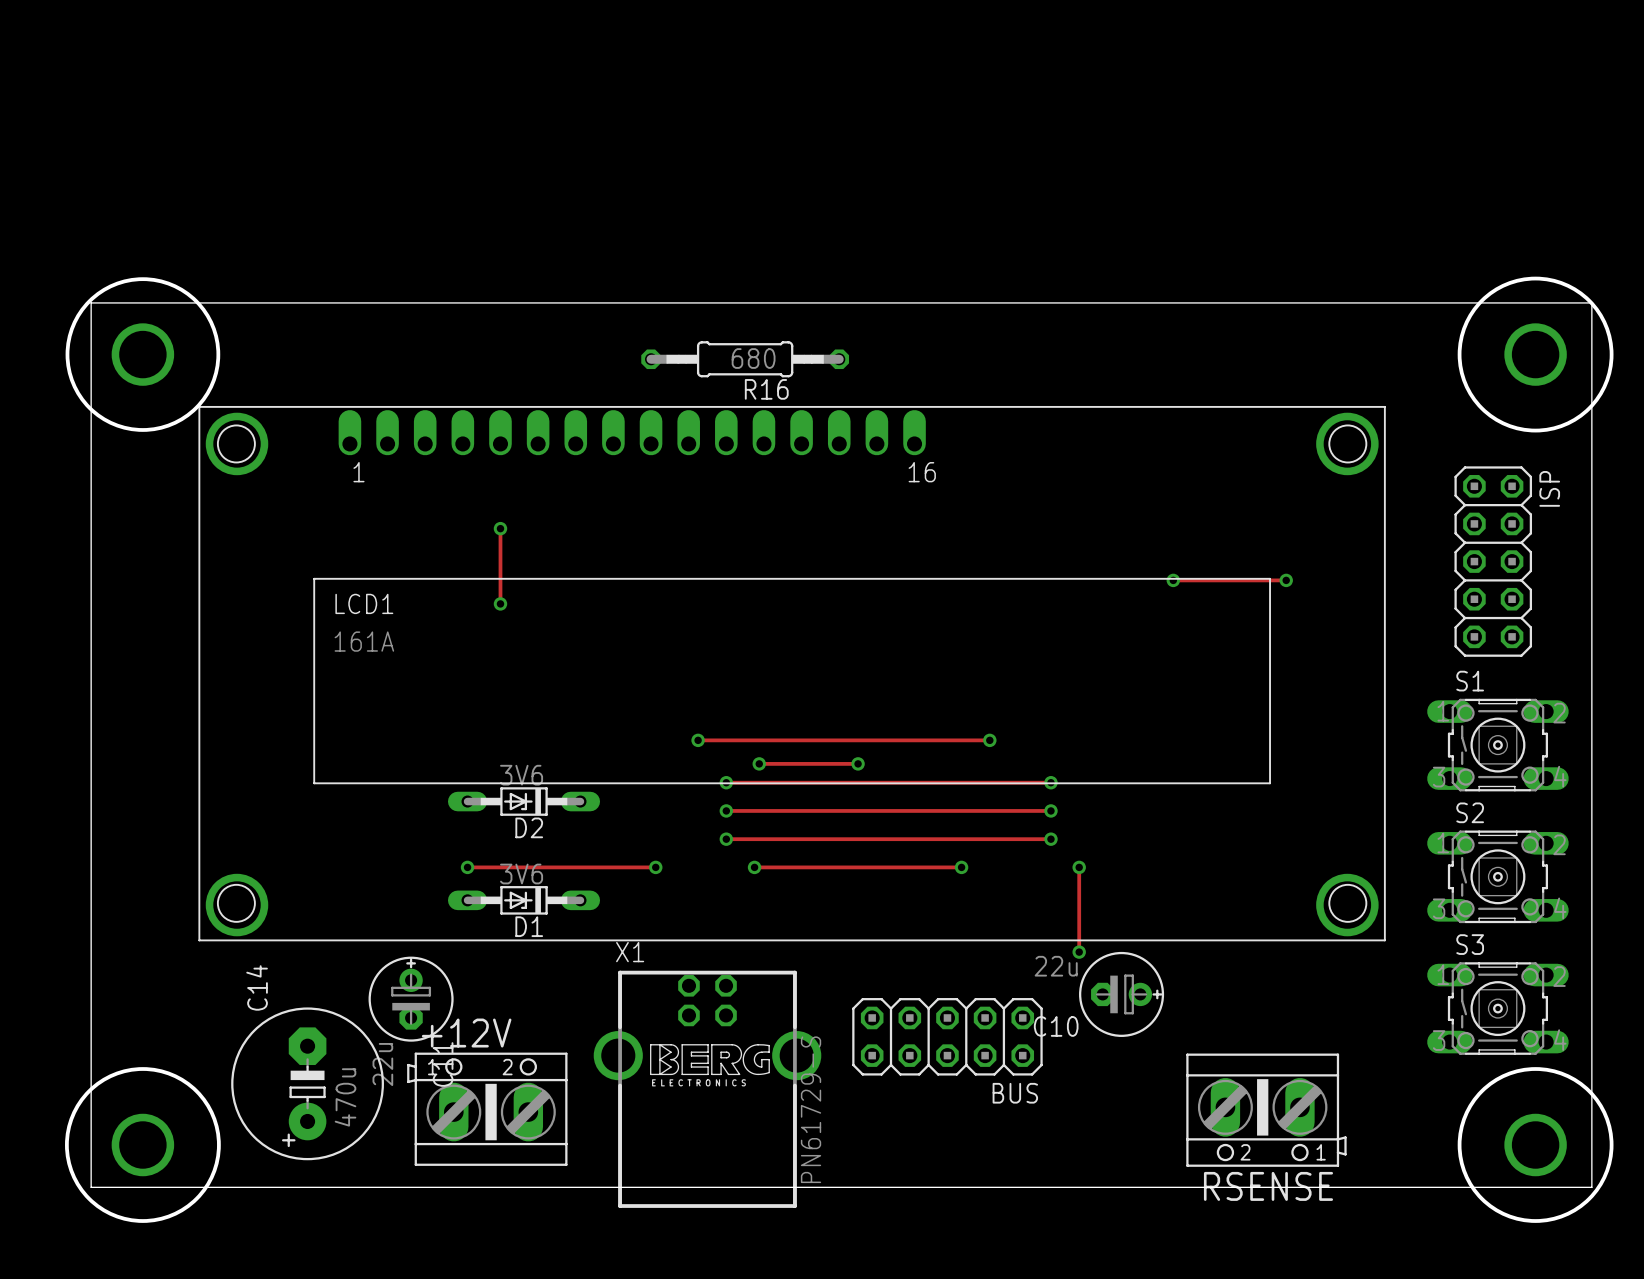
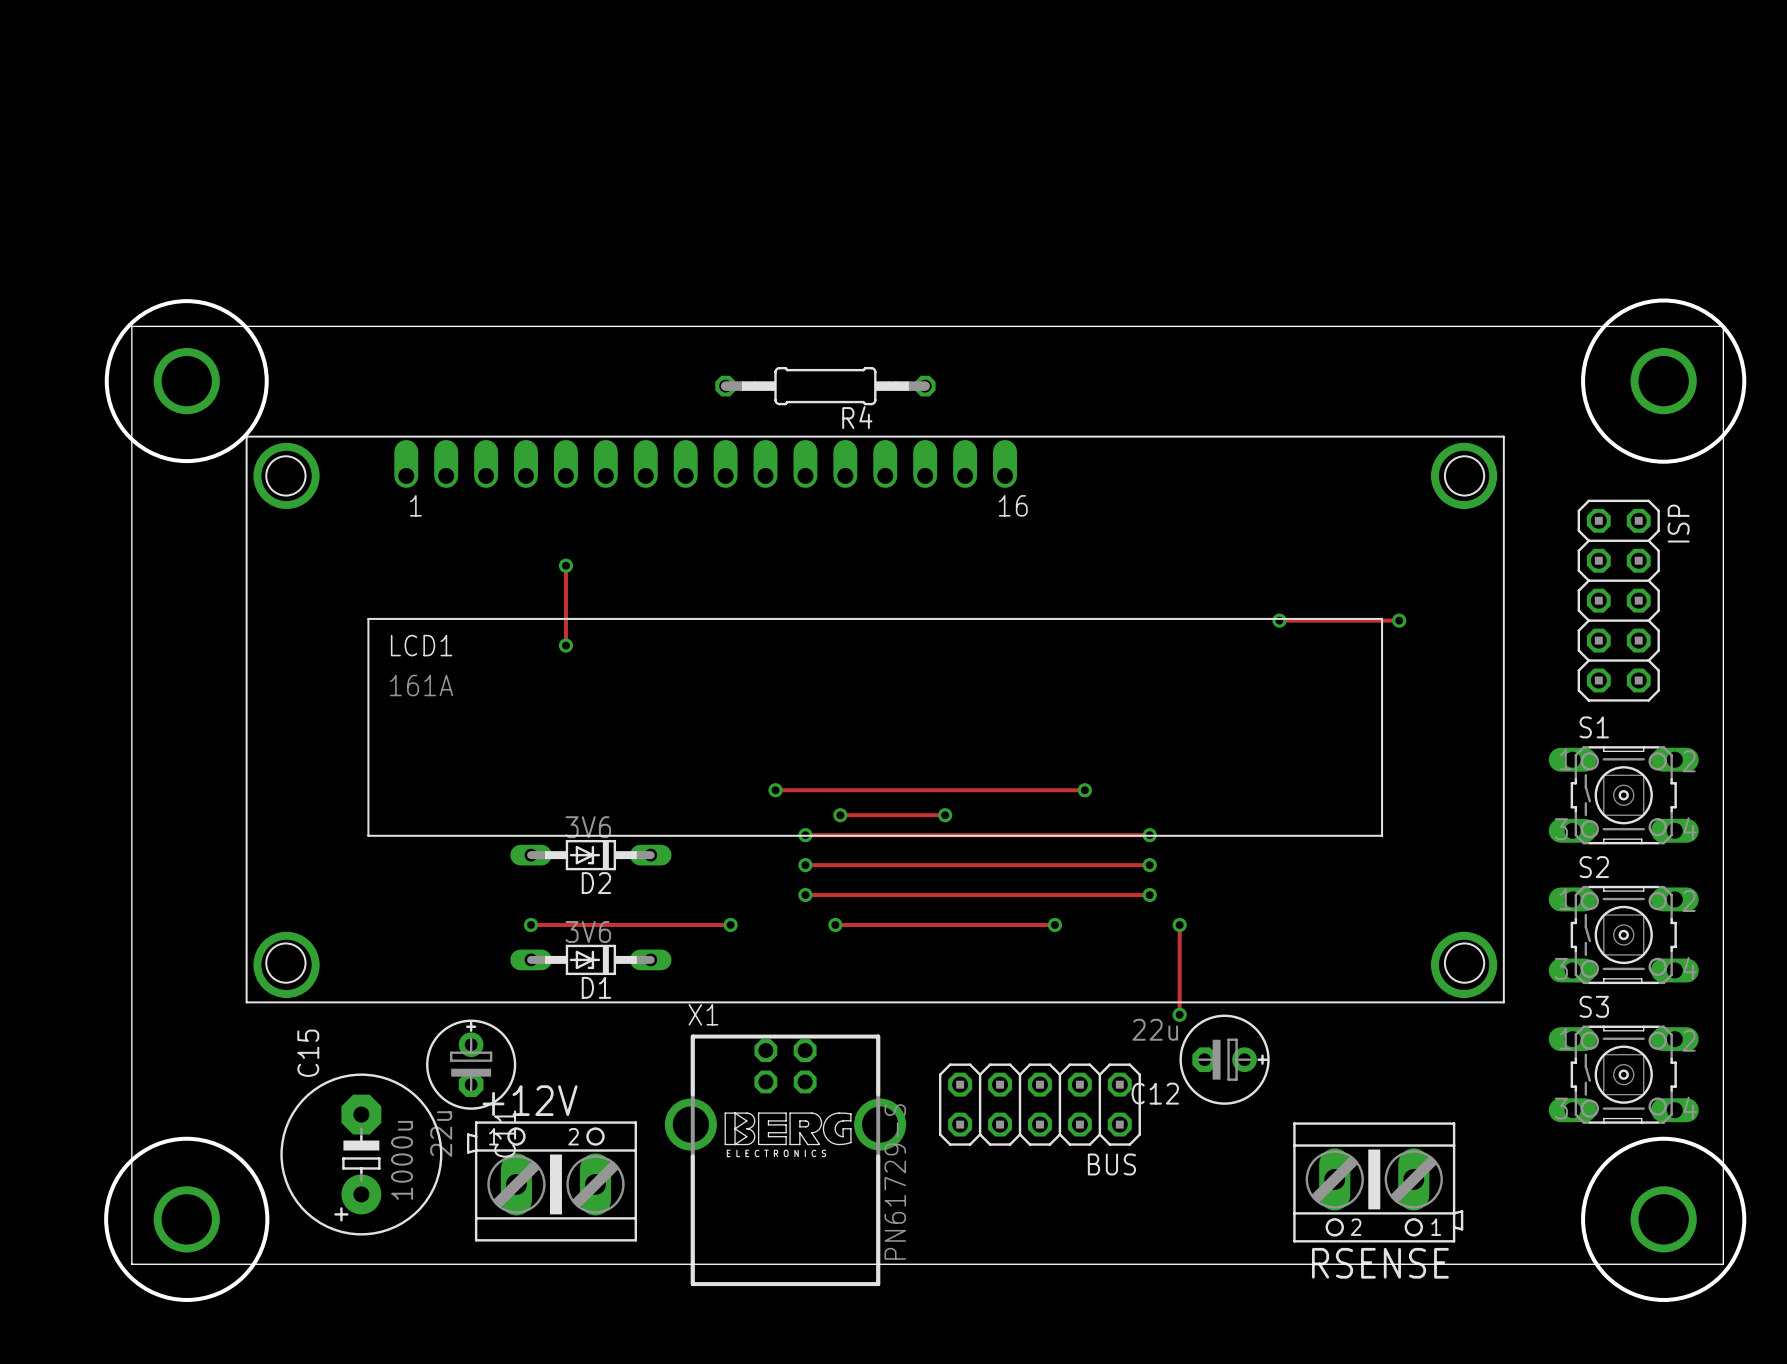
R16 value: 680 (753, 358) -> none
R16 name: R16 (766, 389) -> R4 (857, 417)
C14 name: C14 (257, 987) -> C15 (308, 1053)
C10 name: C10 (1056, 1026) -> C12 (1155, 1093)
C14 value: 470u (345, 1097) -> 1000u (402, 1160)

